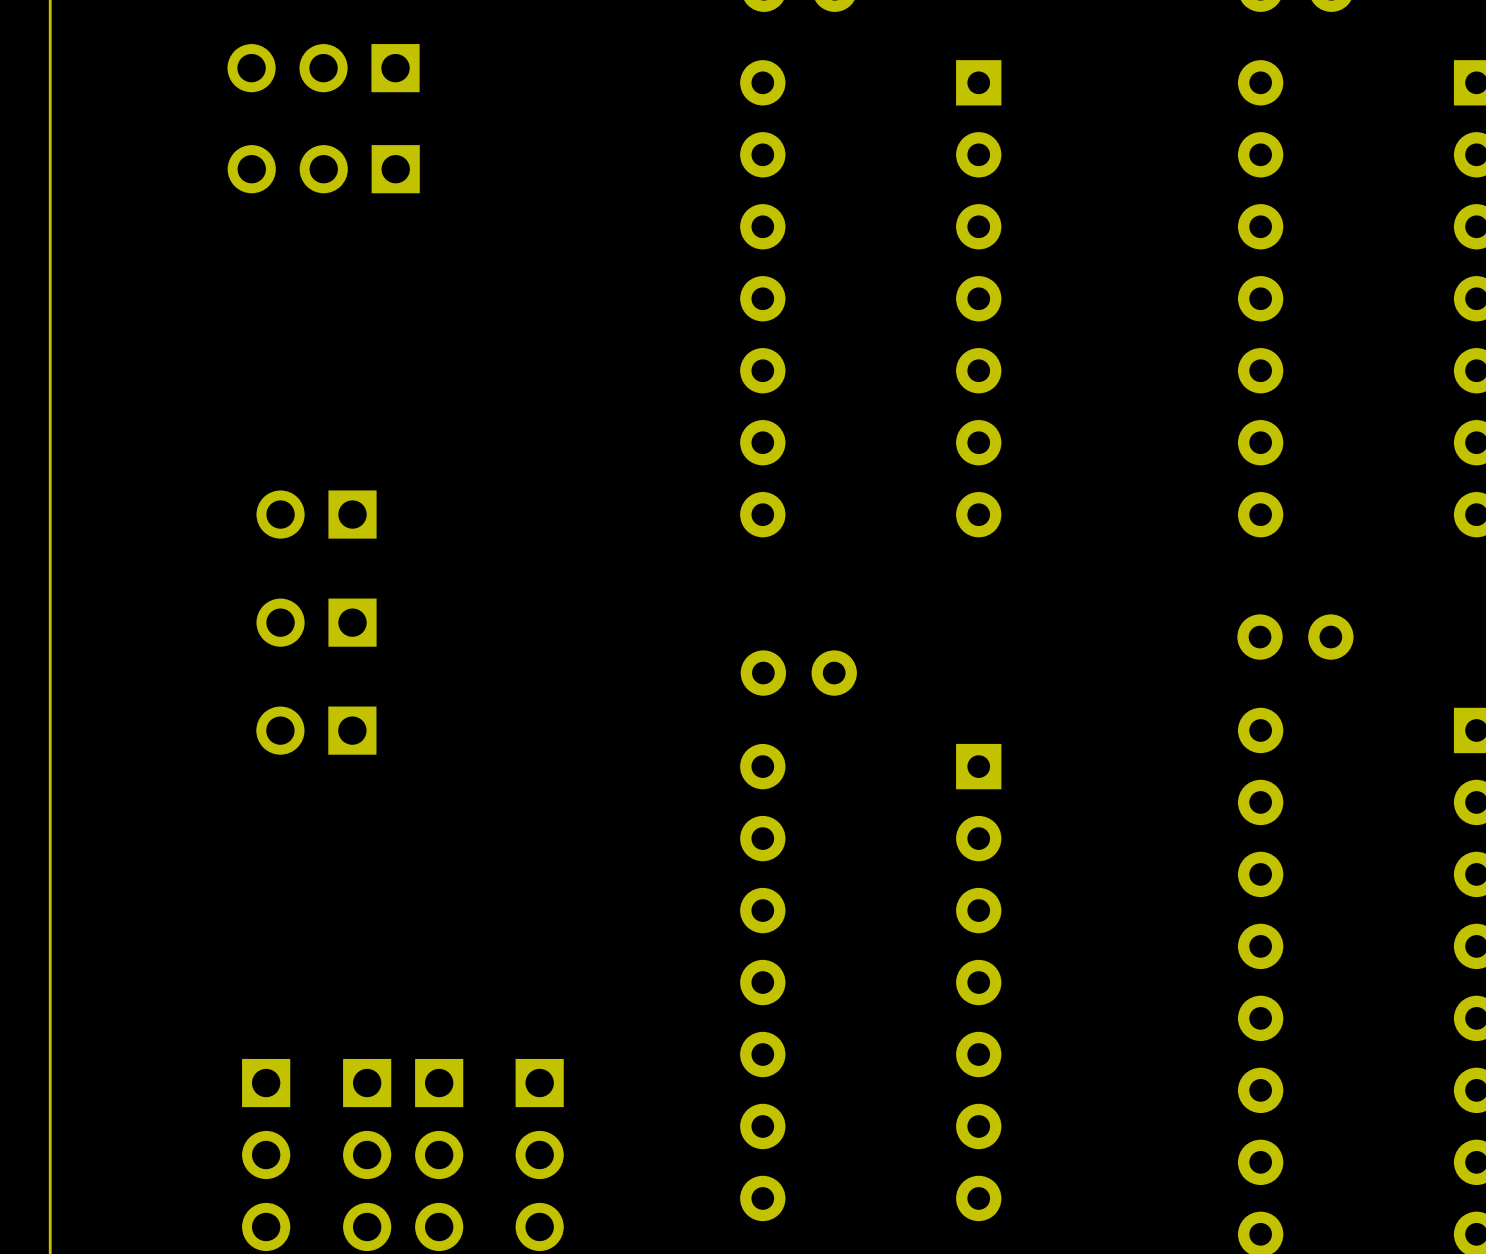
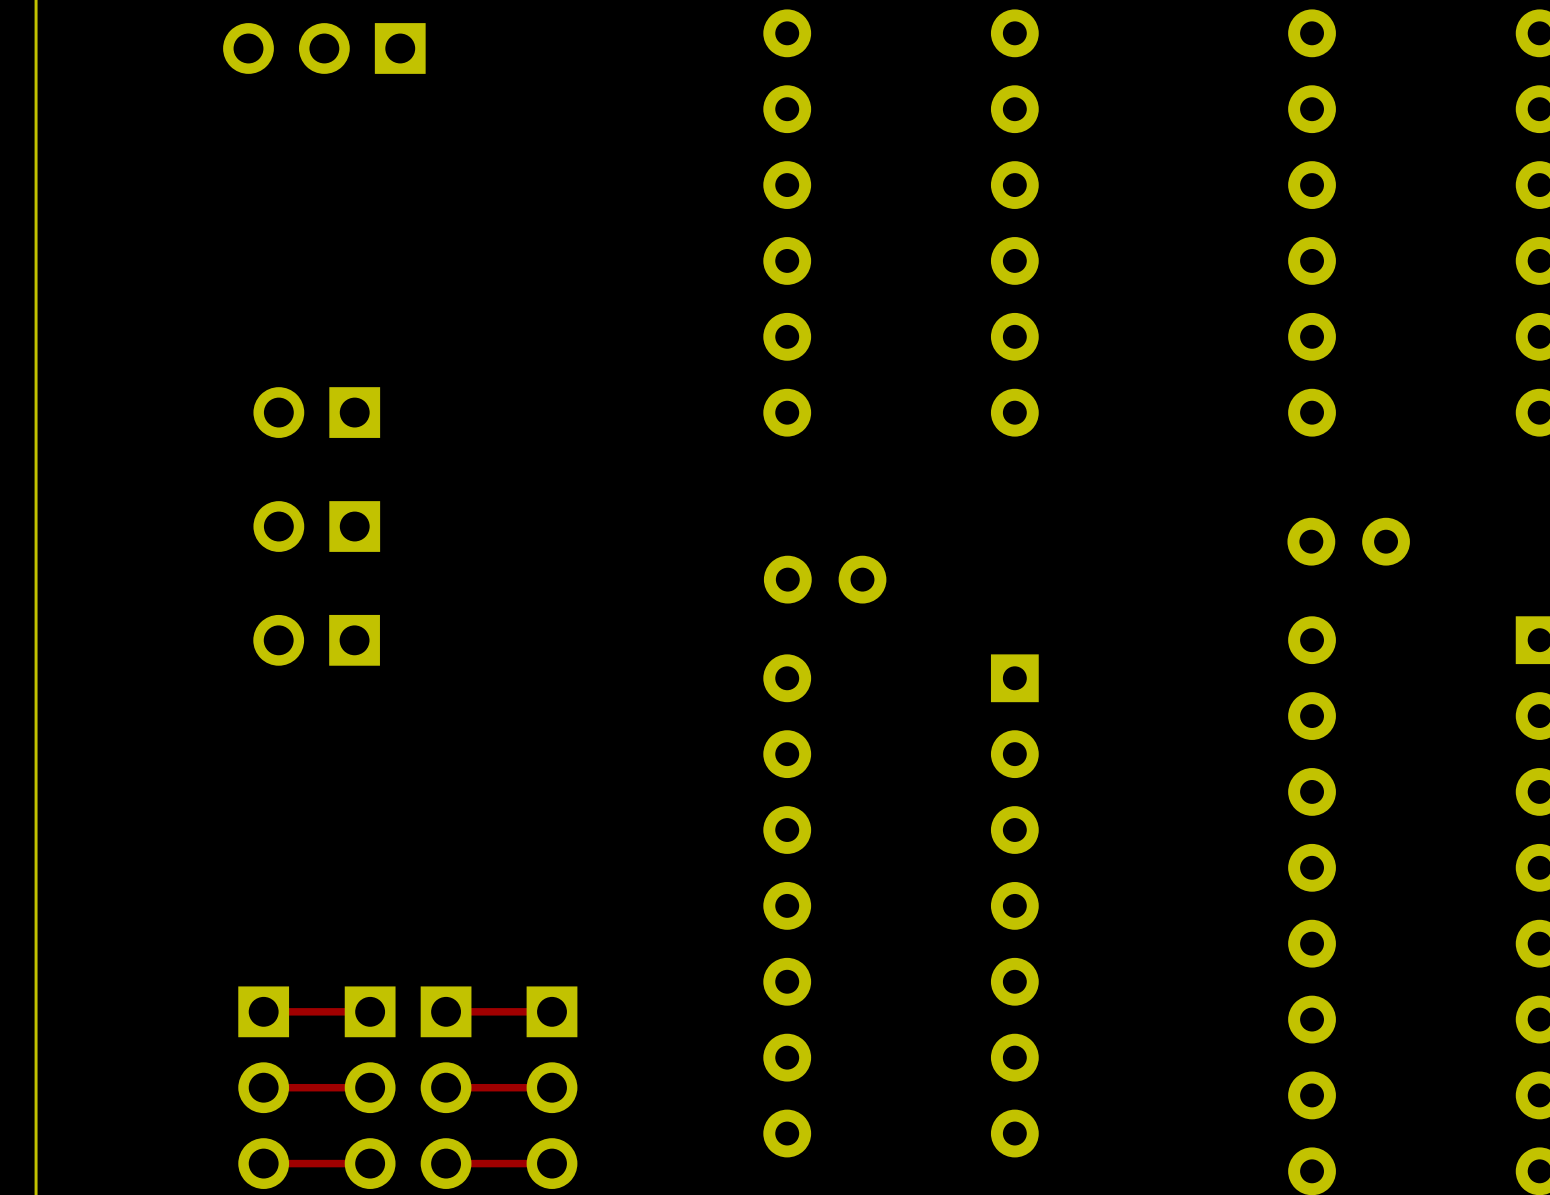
top track: none -> (370, 1011) (263, 1011)
top track: none -> (552, 1011) (446, 1011)
top track: none -> (370, 1087) (263, 1087)
top track: none -> (552, 1087) (446, 1087)
top track: none -> (370, 1163) (263, 1163)
top track: none -> (552, 1163) (446, 1163)

